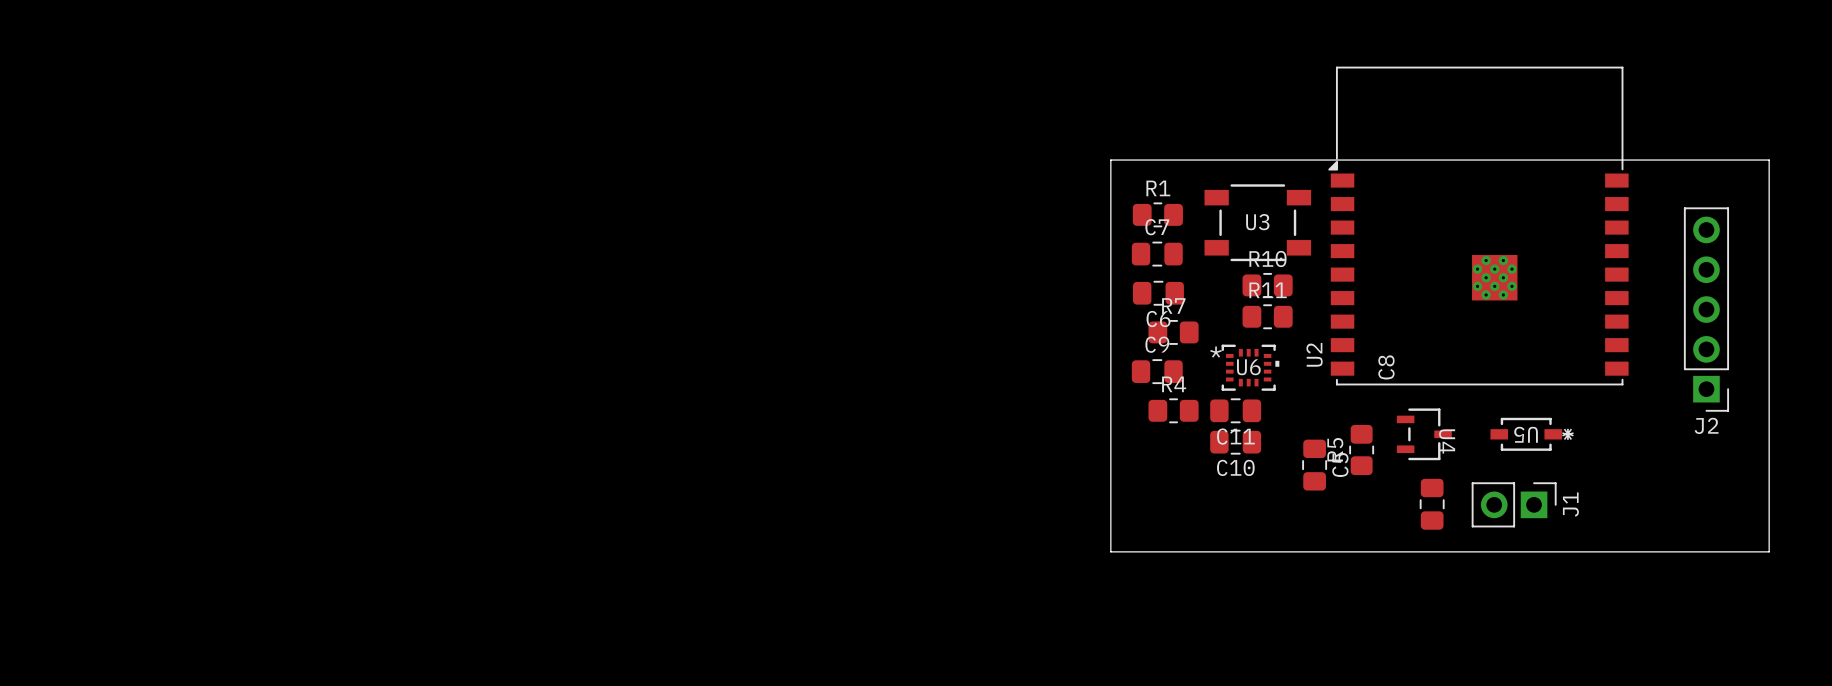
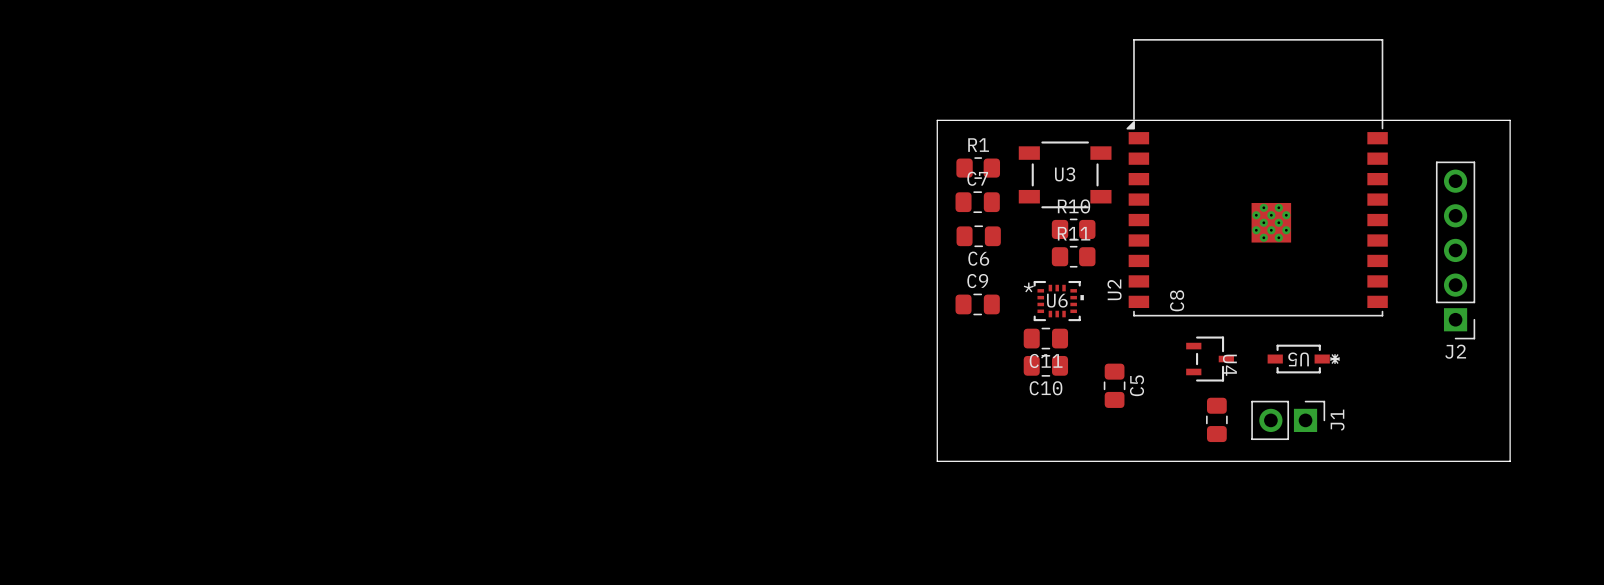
R7: (1173, 332) -> none
R4: (1173, 410) -> none
R5: (1361, 450) -> none

